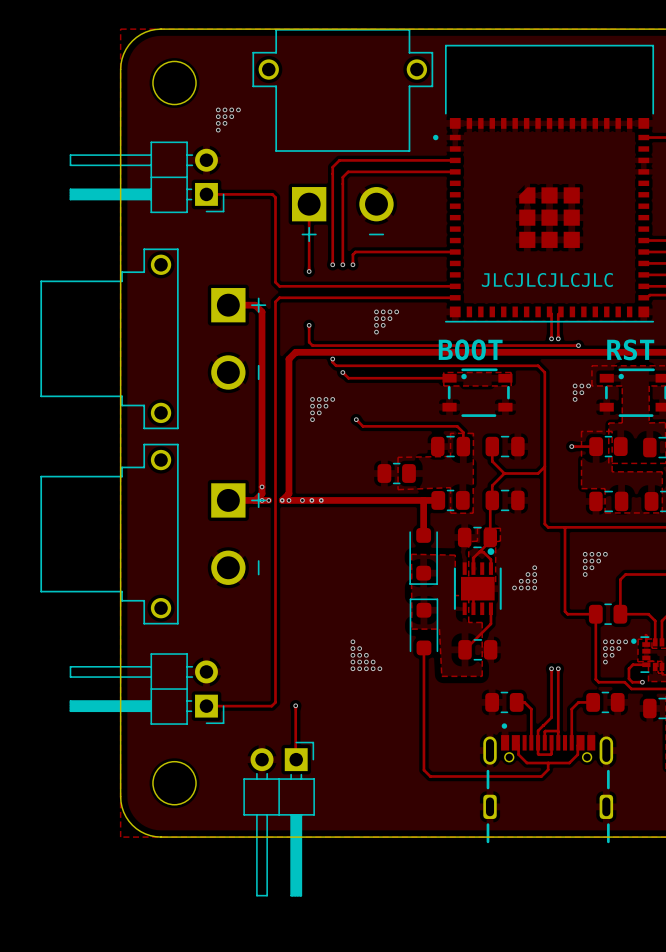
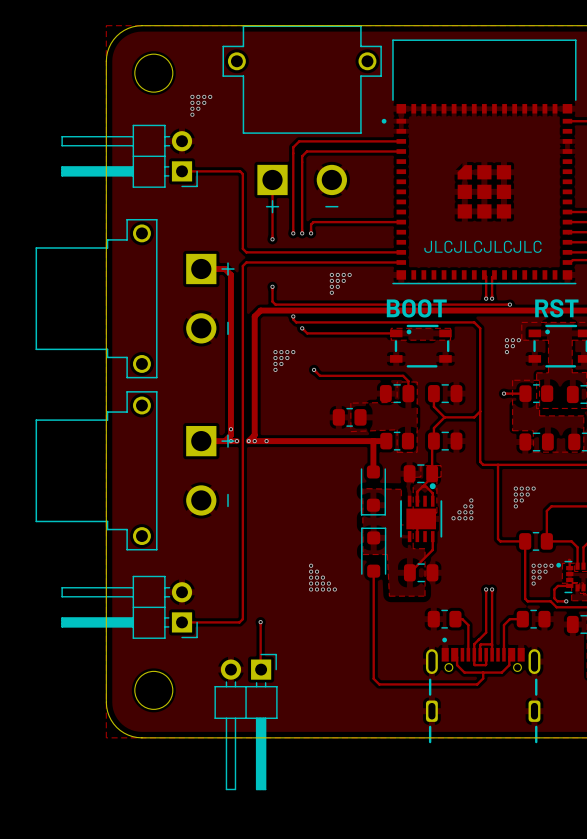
via: (311, 500) -> none
via: (321, 500) -> none

